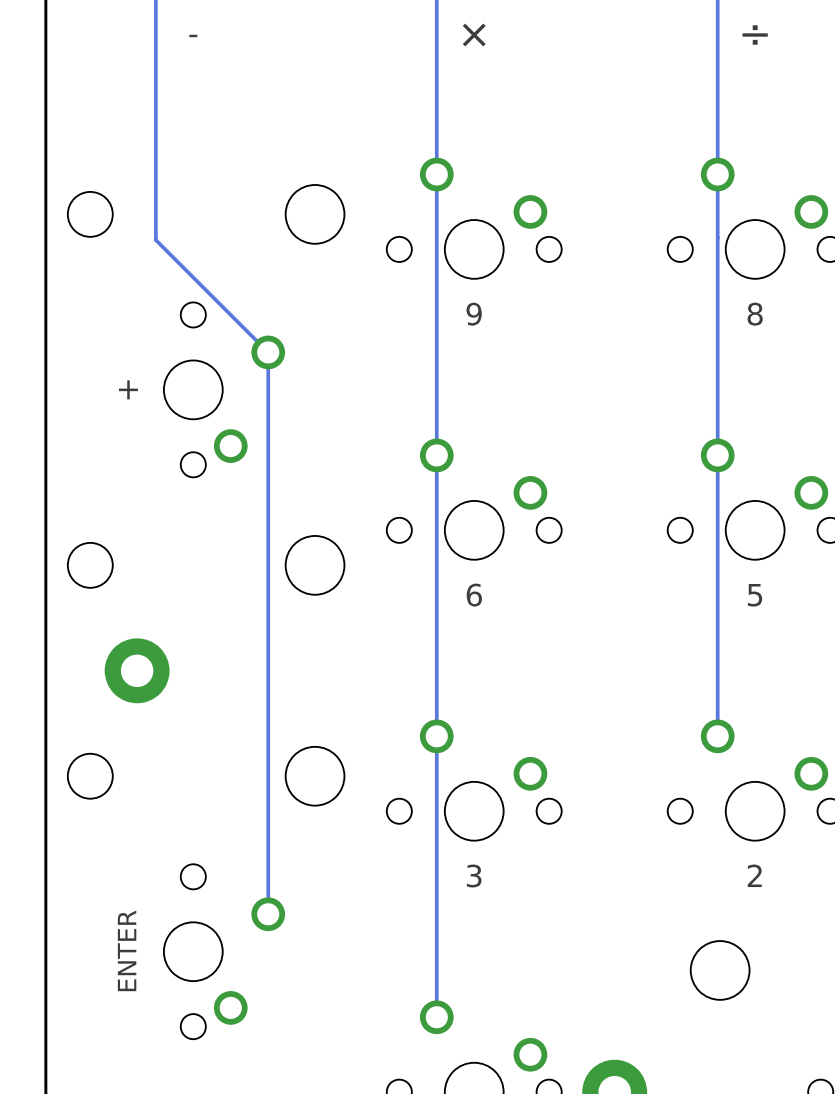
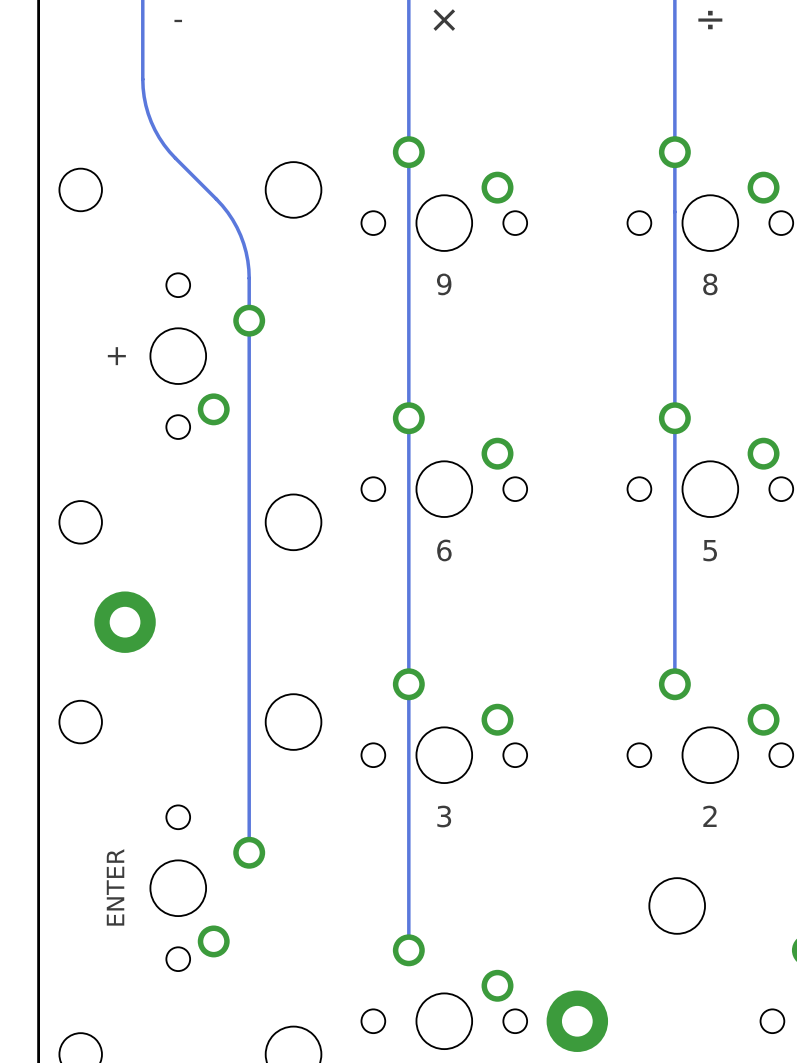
track: (155, 97) (155, 240) (268, 352) -> (142, 79) (148, 113) (159, 137) (175, 158) (222, 205) (240, 235) (248, 269) (249, 320)

